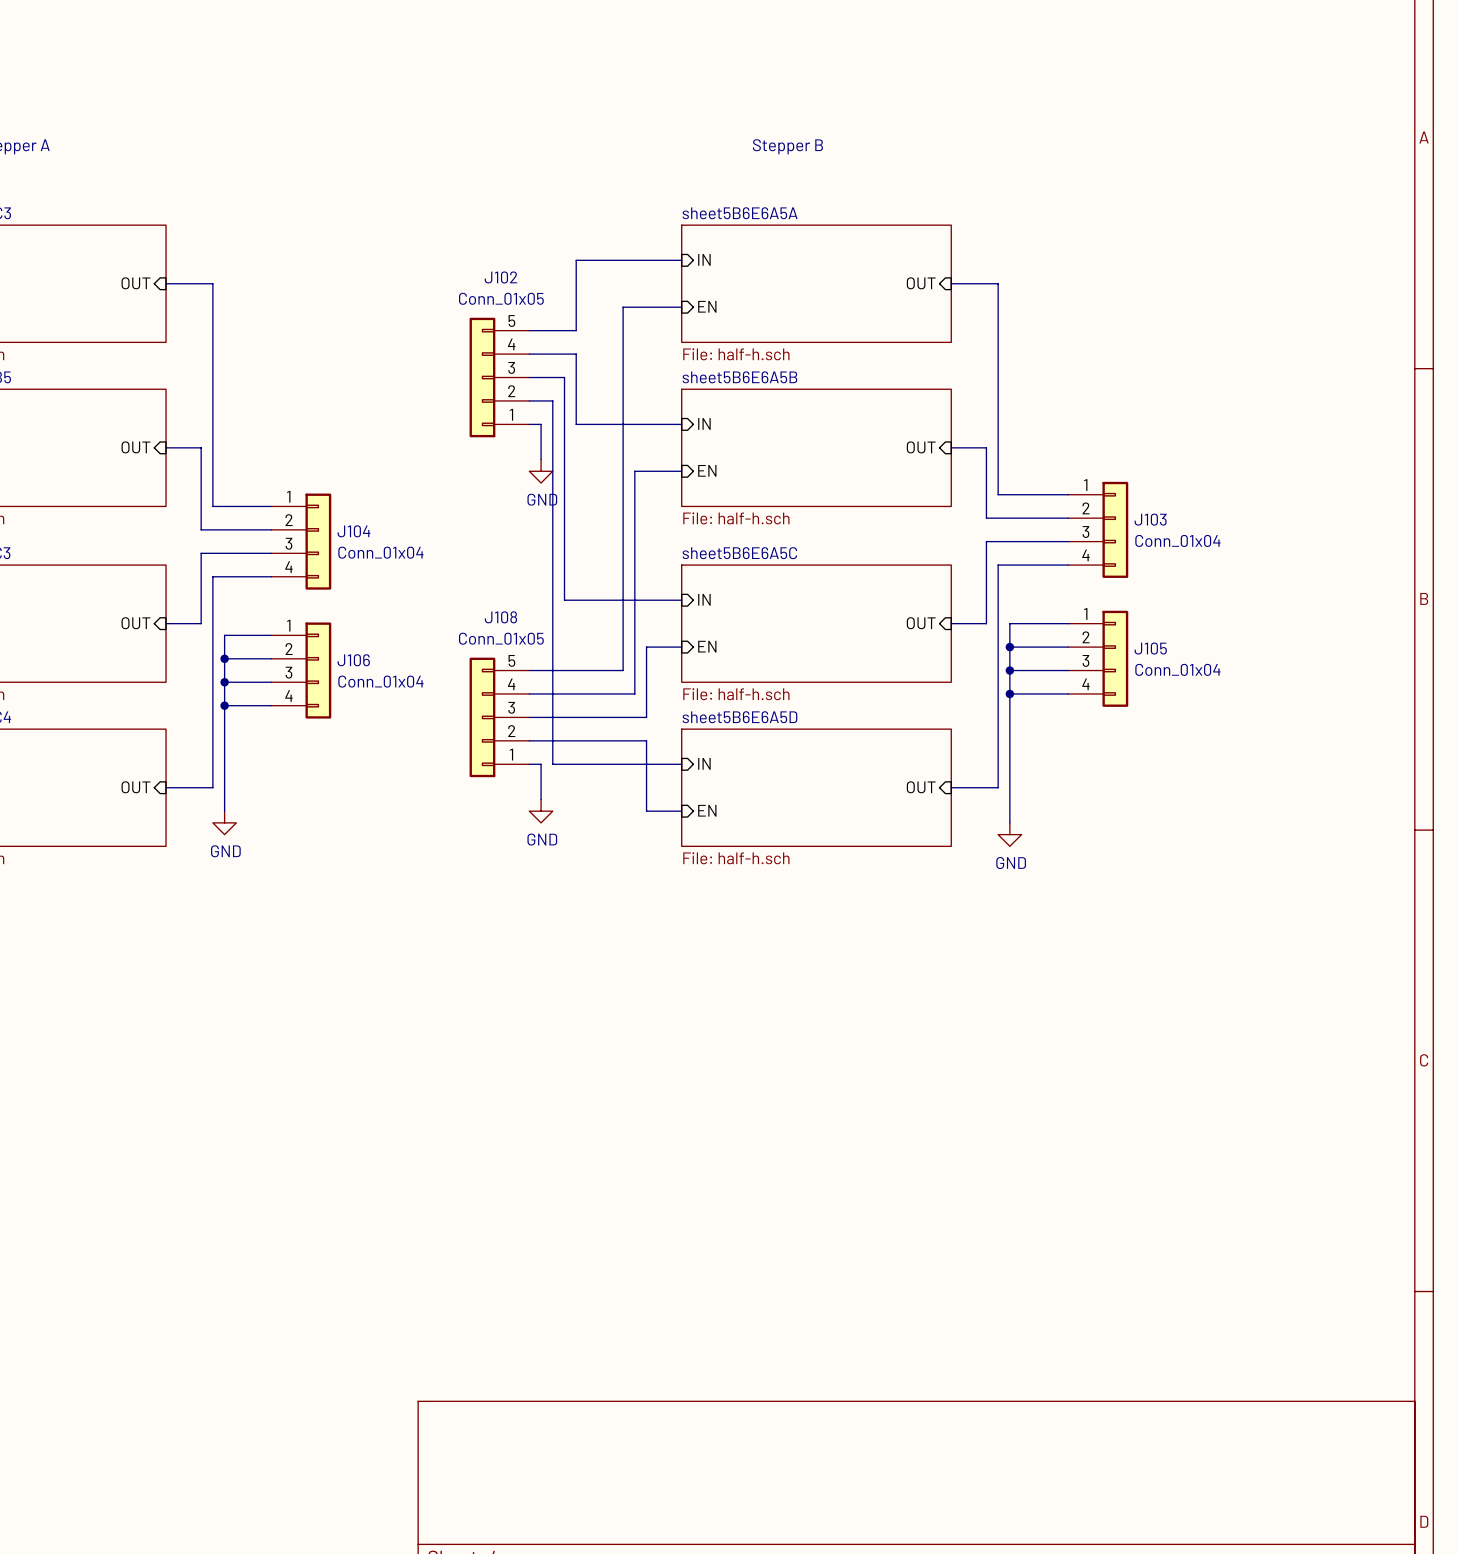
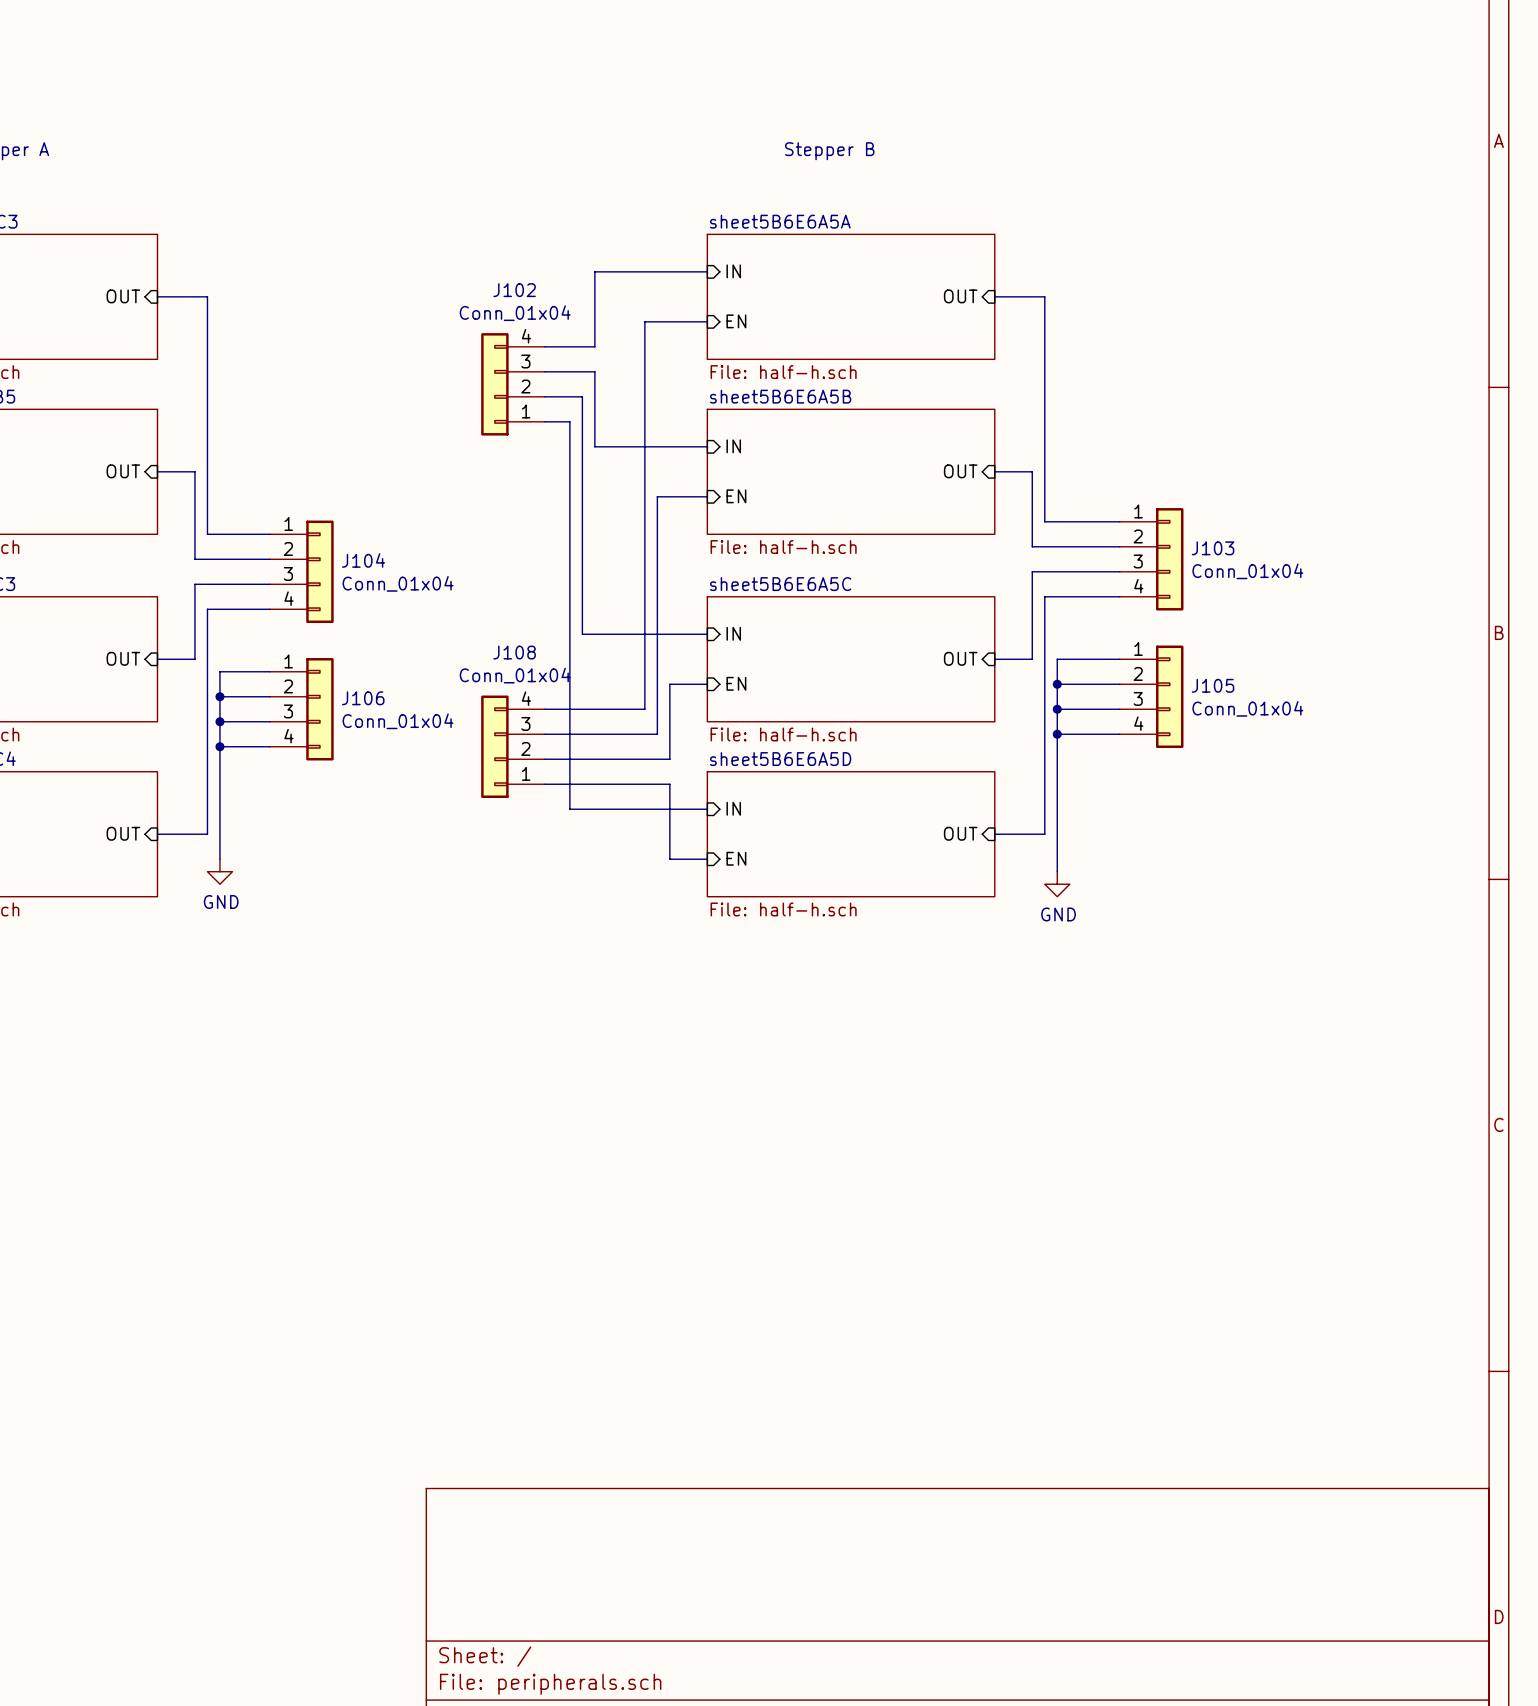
J102 value: Conn_01x05 (501, 298) -> Conn_01x04 (515, 313)
J102 symbol: [469, 317, 530, 438] -> [481, 333, 545, 436]
wire: (529, 424) (541, 424) (541, 459) -> none
power symbol: GND (541, 471) -> none
J108 value: Conn_01x05 (501, 638) -> Conn_01x04 (515, 675)
J108 symbol: [469, 657, 530, 778] -> [481, 695, 545, 798]
wire: (529, 764) (541, 764) (541, 799) -> none
power symbol: GND (541, 811) -> none

